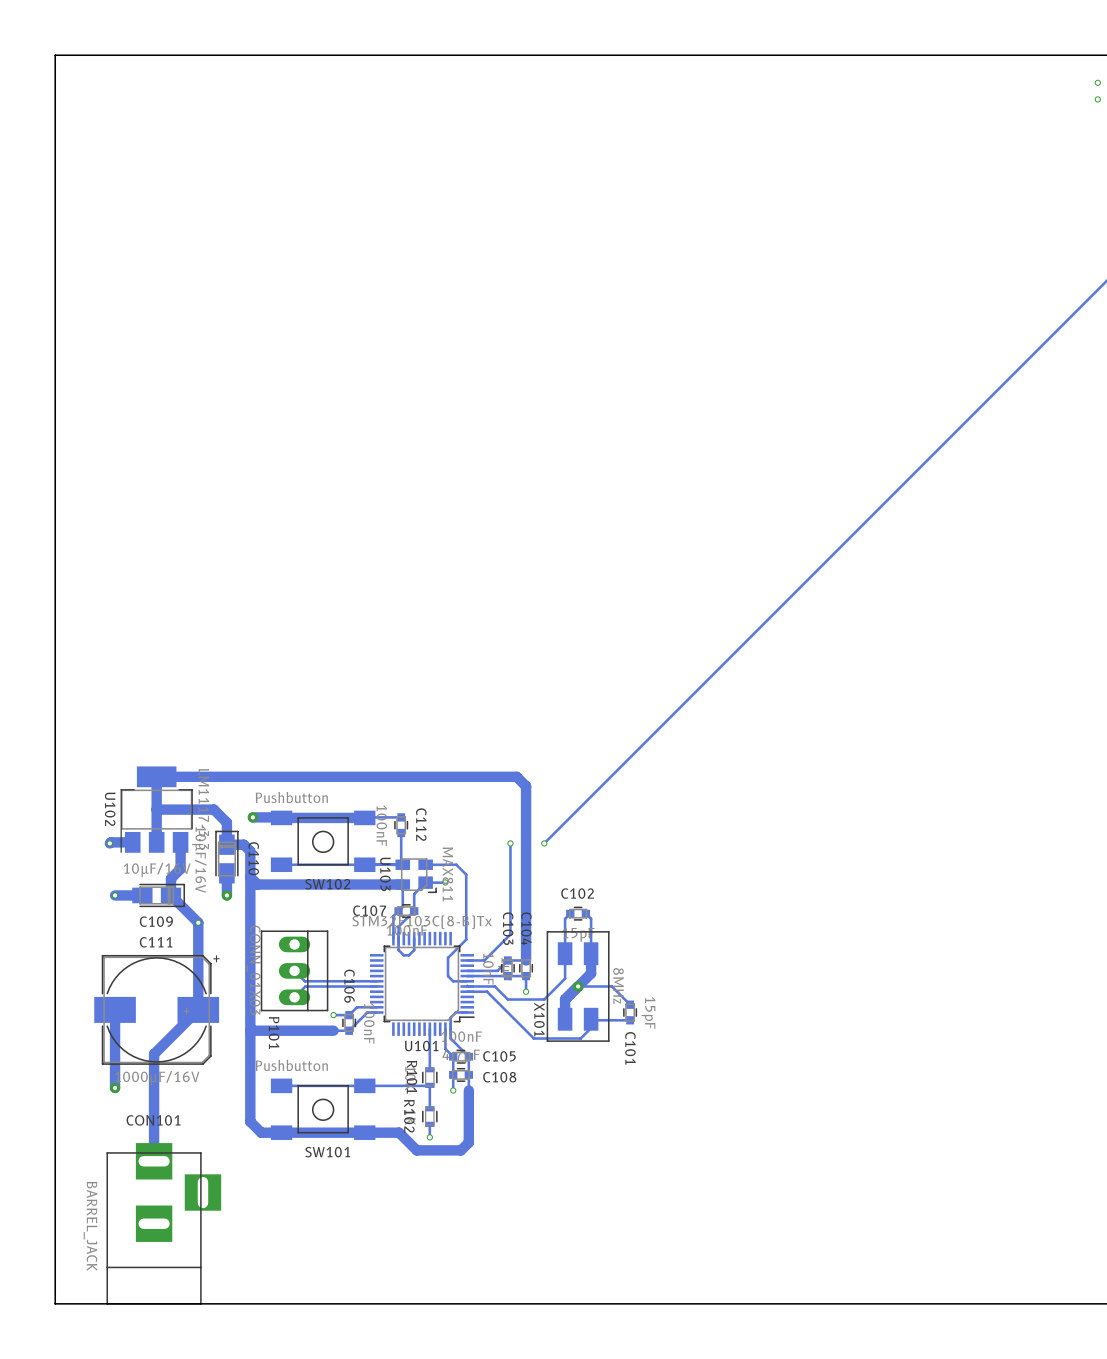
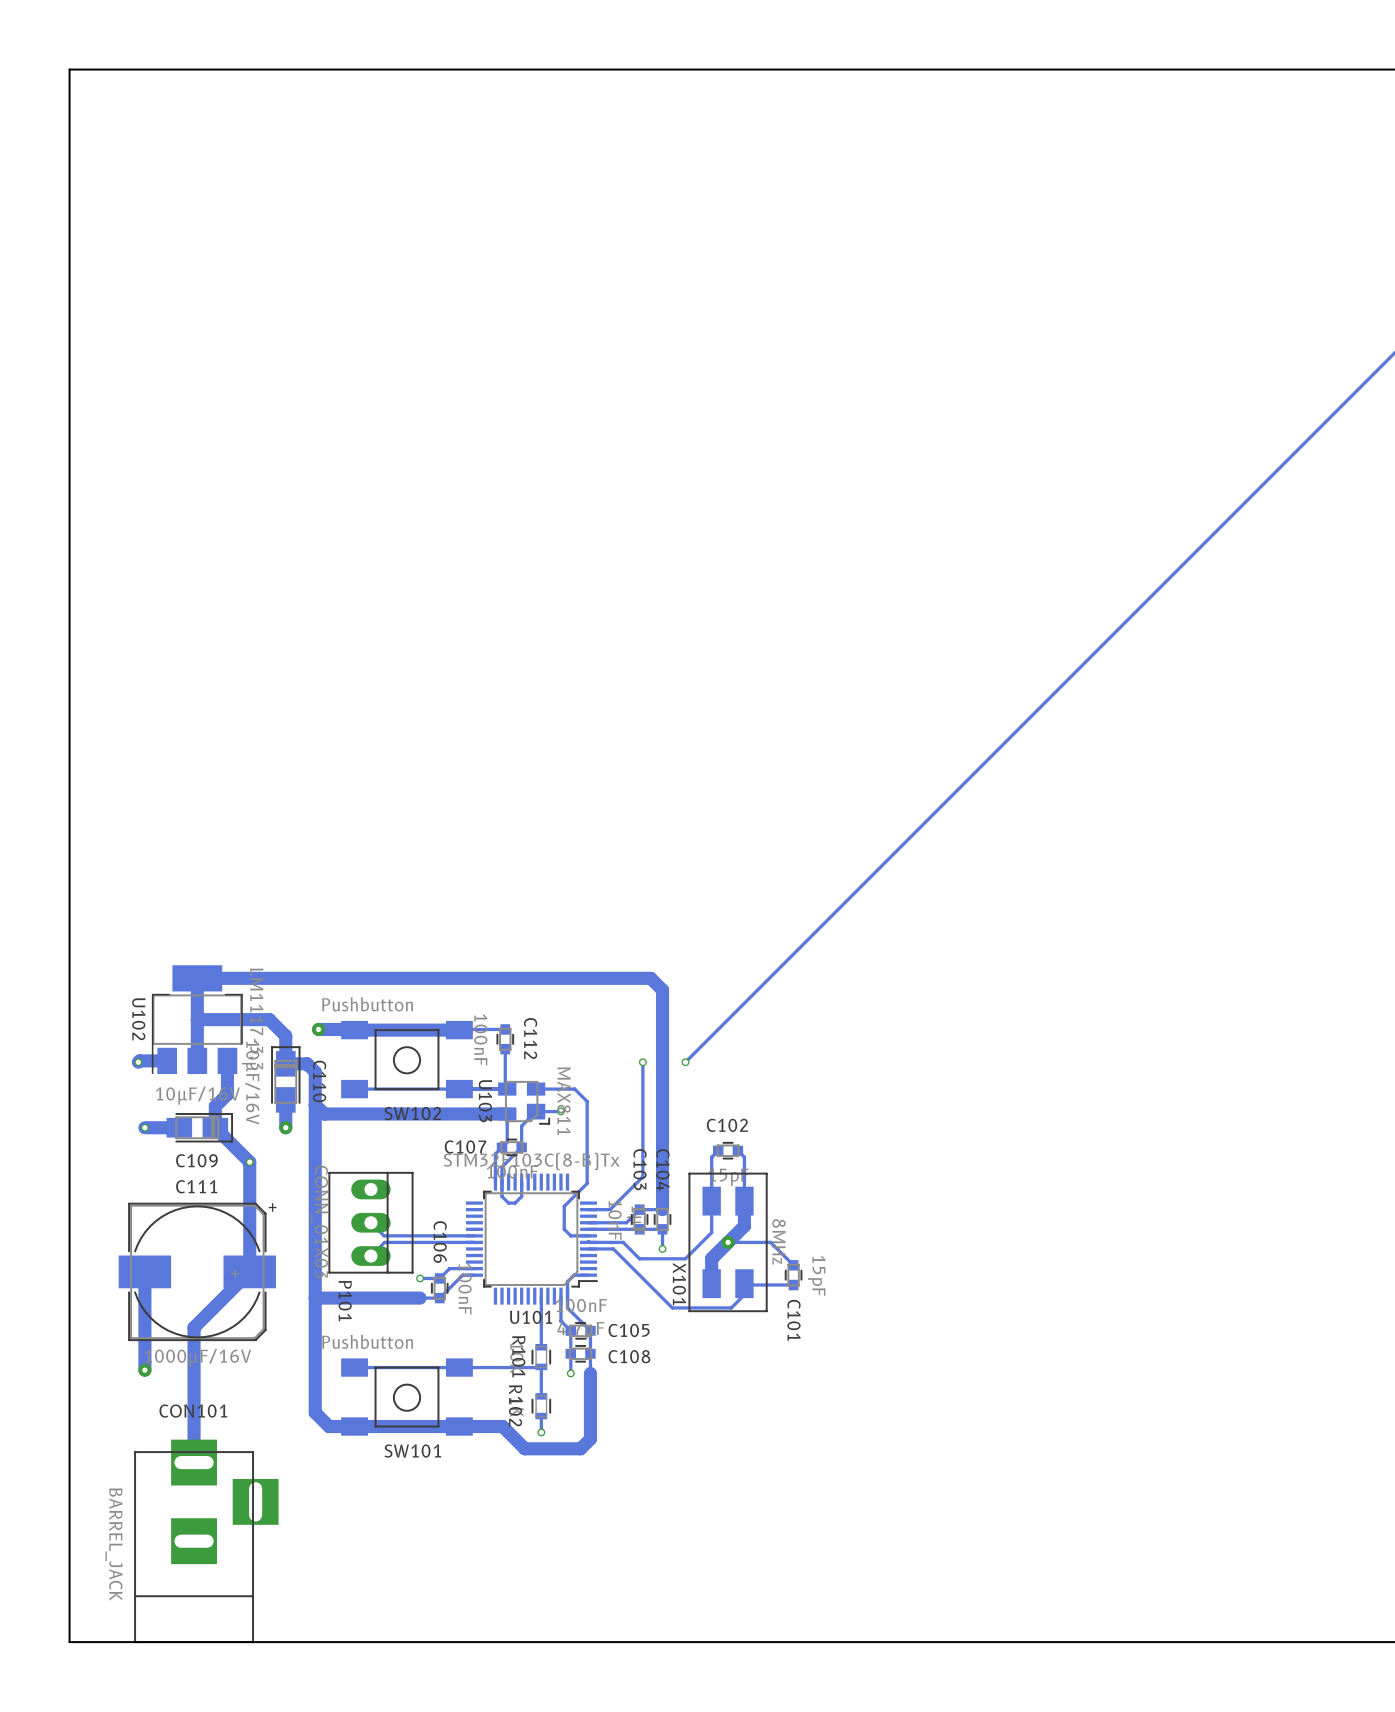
via: (1097, 82) -> none
via: (1097, 99) -> none

